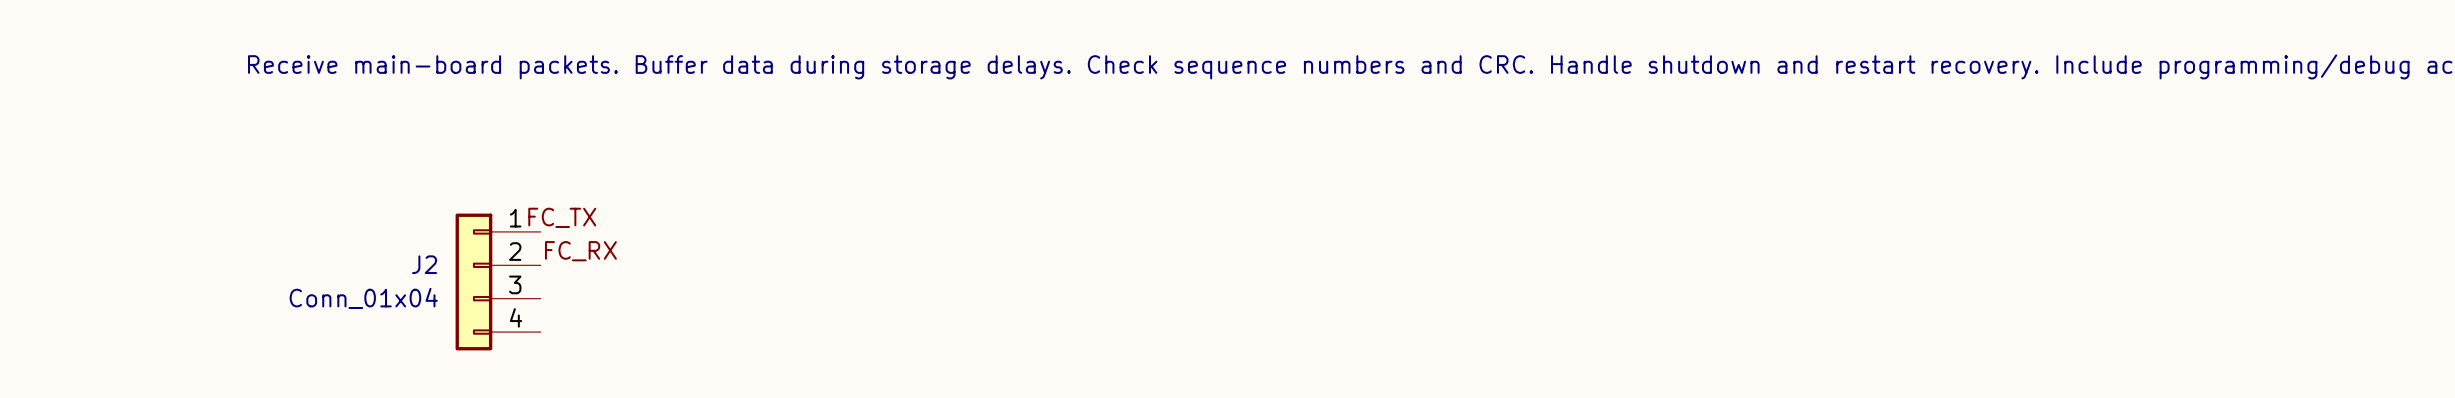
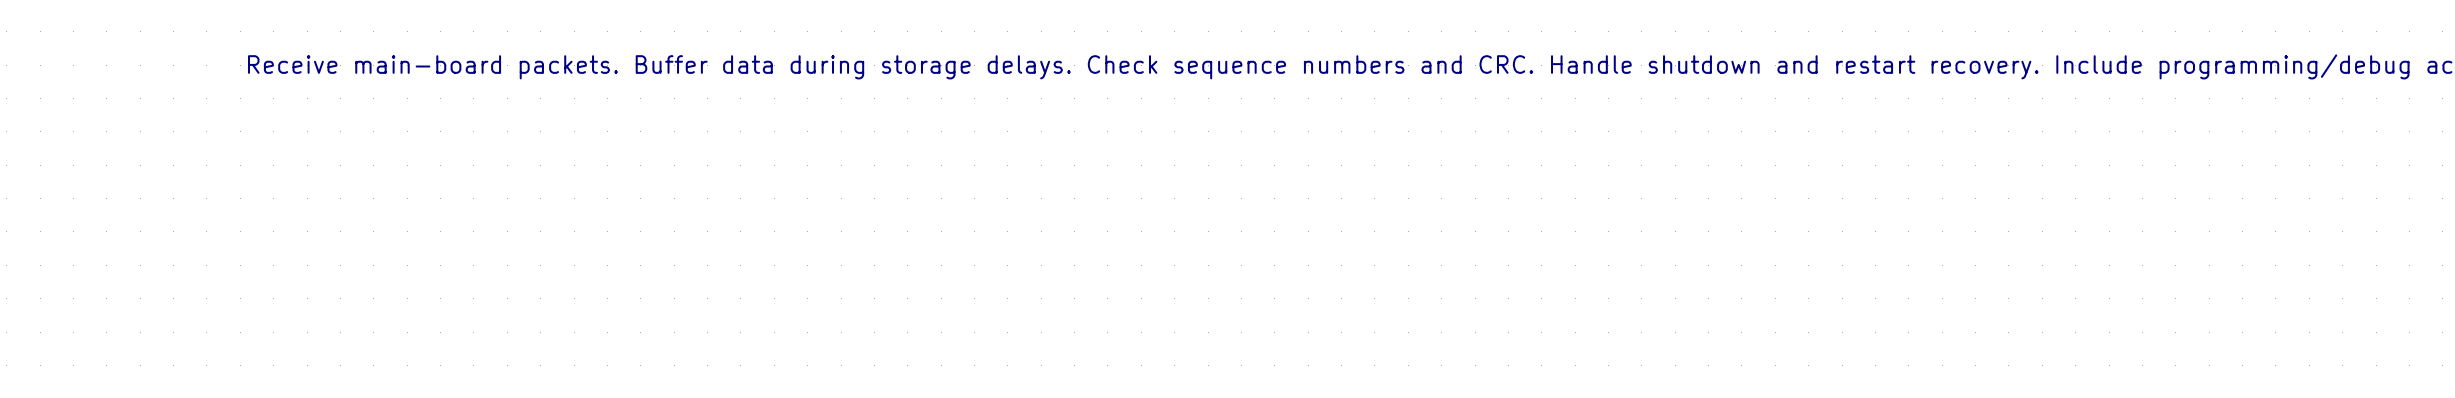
label: FC_TX (562, 217) -> none
label: FC_RX (580, 251) -> none
J2: Conn_01x04 (498, 281) -> none

